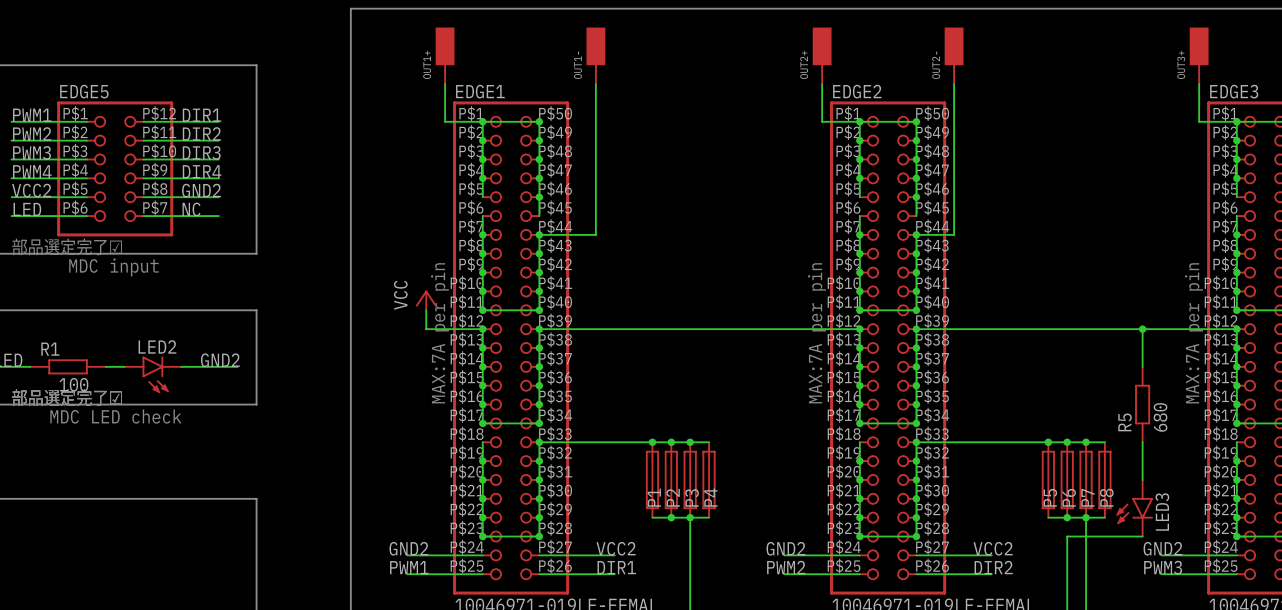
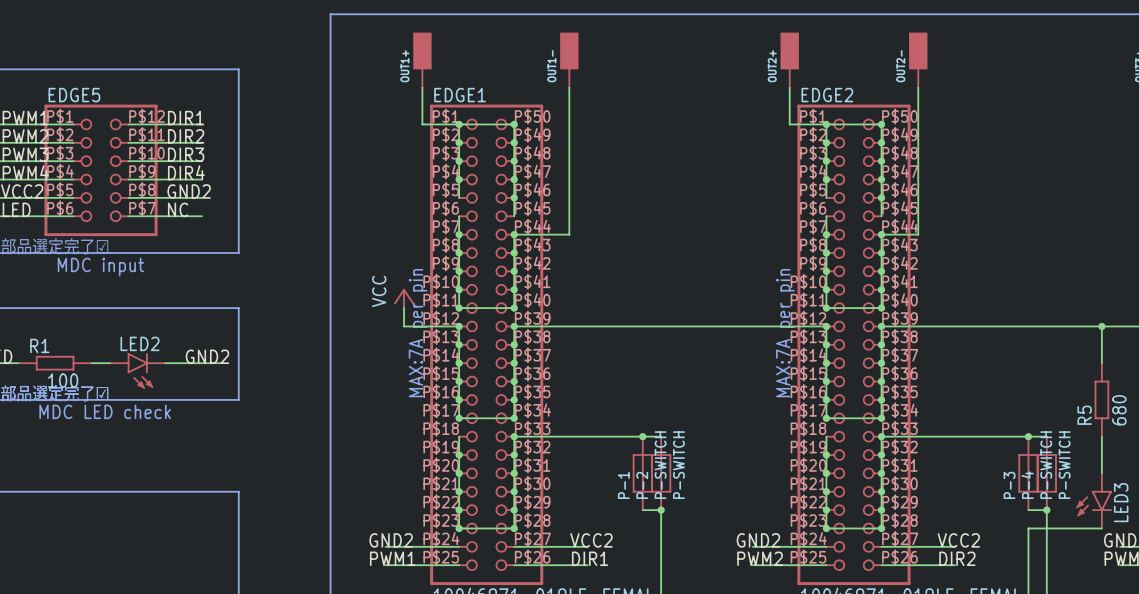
junction: (652, 442) -> none
wire: (690, 442) (709, 442) -> none
junction: (690, 442) -> none
junction: (1048, 442) -> none
wire: (1086, 442) (1104, 442) -> none
junction: (1086, 442) -> none
P1: (652, 479) -> none
P2: (671, 479) -> none
P-1: none -> P-SWITCH (642, 473)
P3: (690, 479) -> none
P-2: none -> P-SWITCH (661, 473)
P4: (709, 479) -> none
P5: (1048, 479) -> none
P6: (1067, 479) -> none
P-3: none -> P-SWITCH (1028, 473)
P7: (1086, 479) -> none
P-4: none -> P-SWITCH (1046, 473)
P8: (1104, 479) -> none
wire: (652, 517) (671, 517) -> none
junction: (671, 517) -> none
wire: (690, 517) (709, 517) -> none
wire: (1048, 517) (1067, 517) -> none
junction: (1067, 517) -> none
wire: (1086, 517) (1104, 517) -> none

